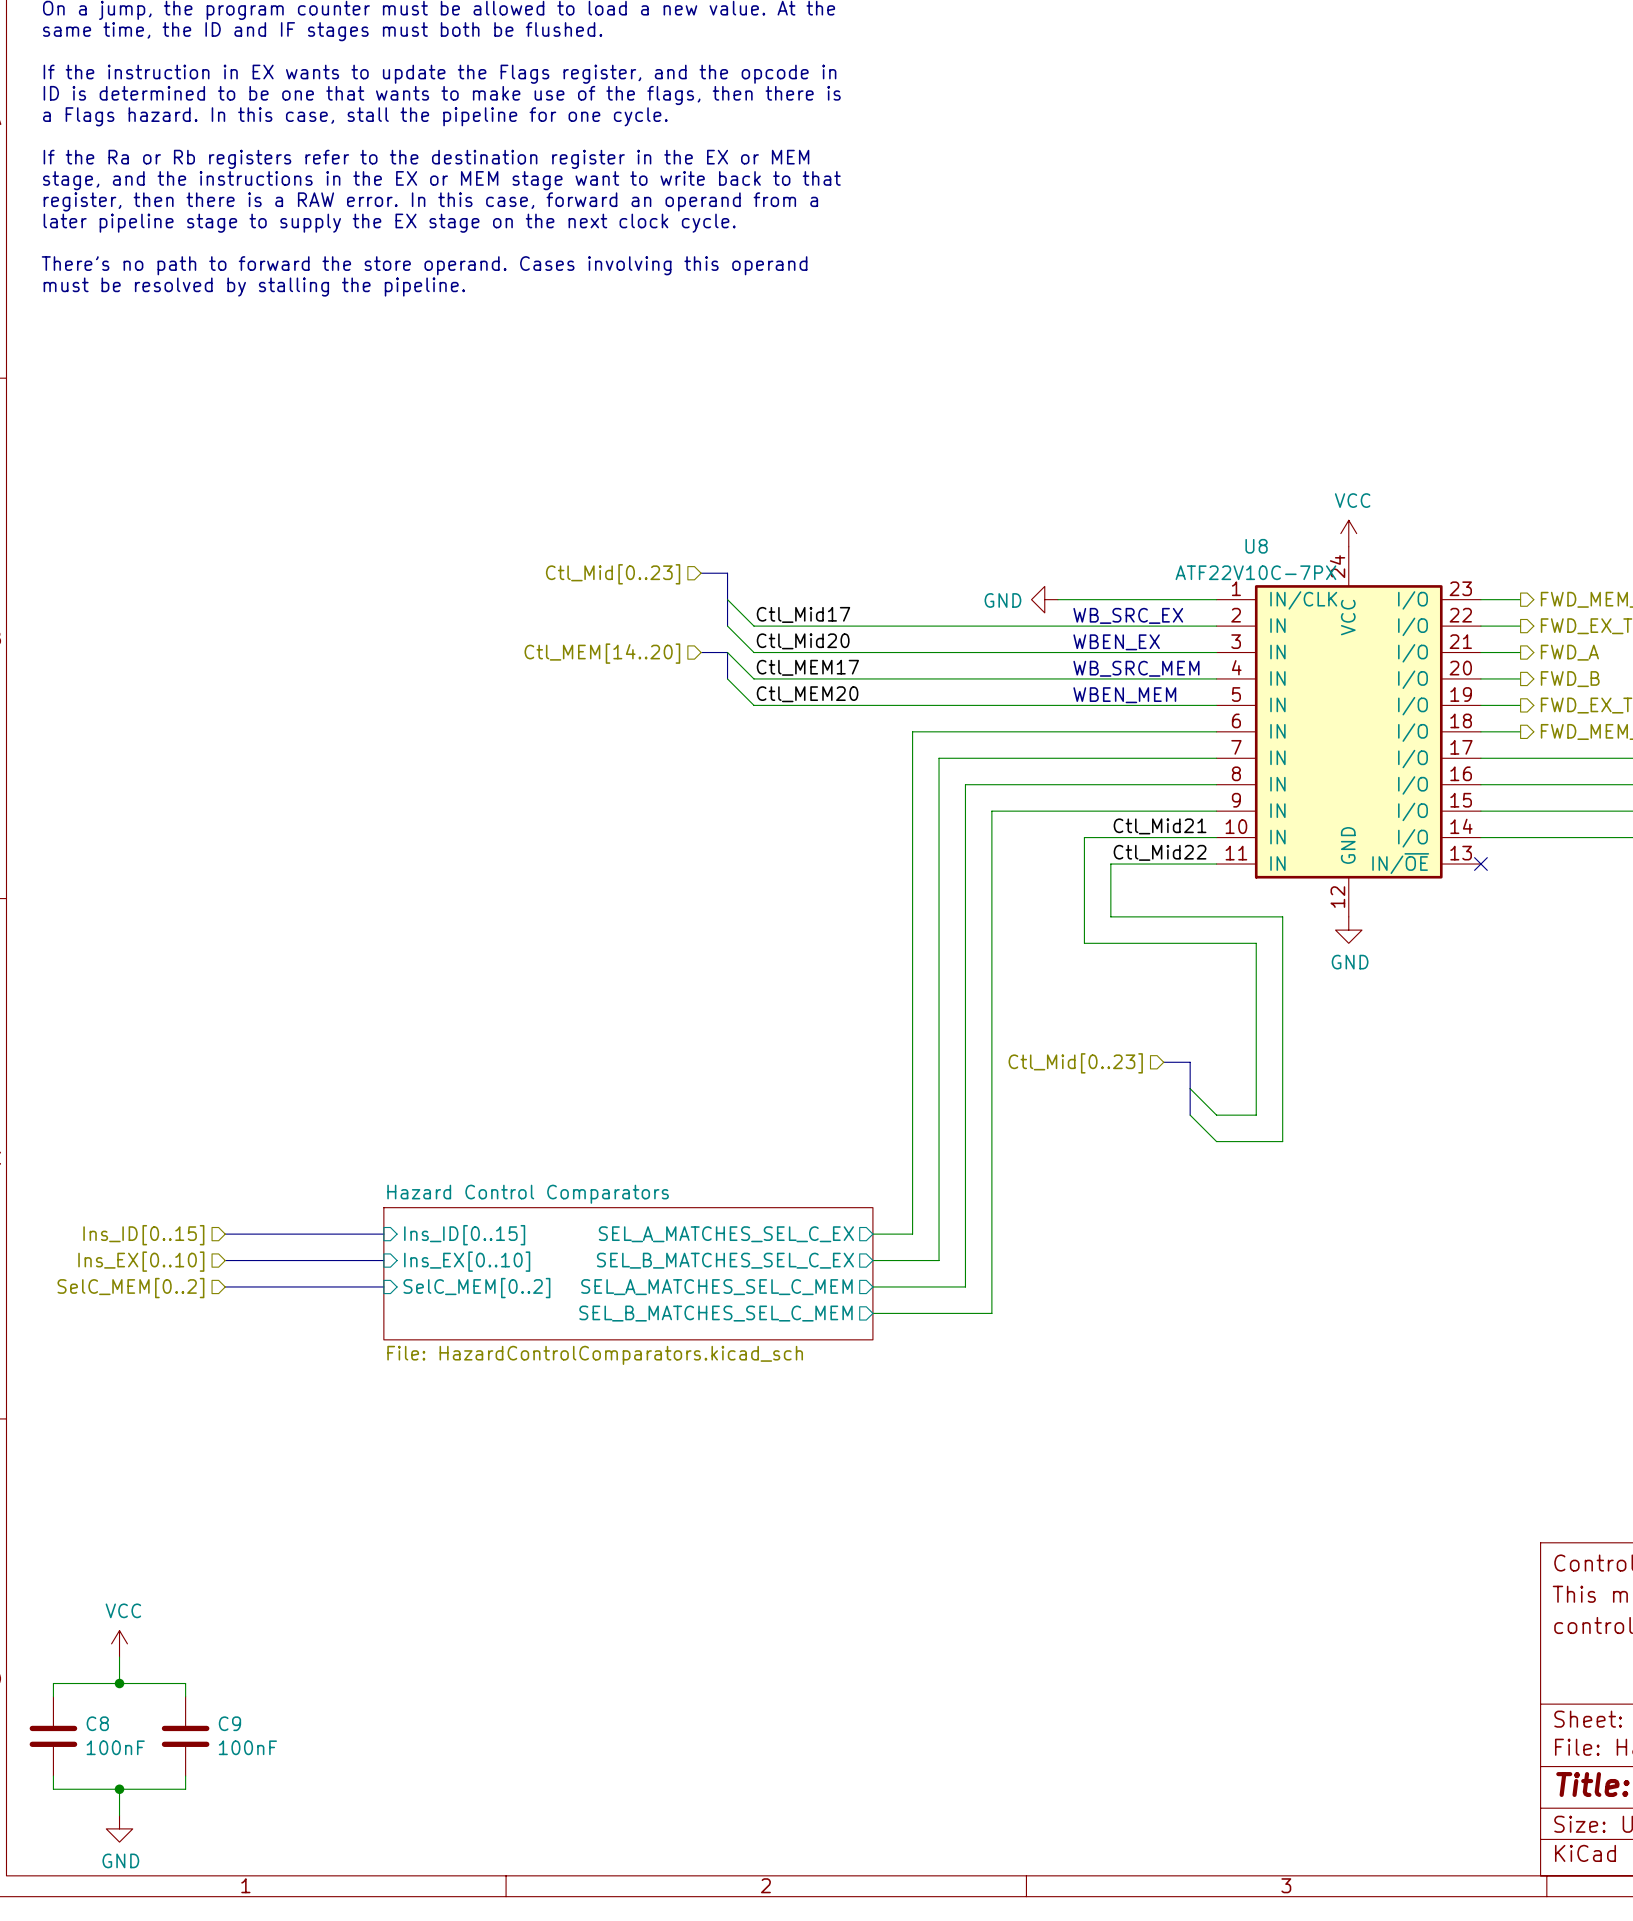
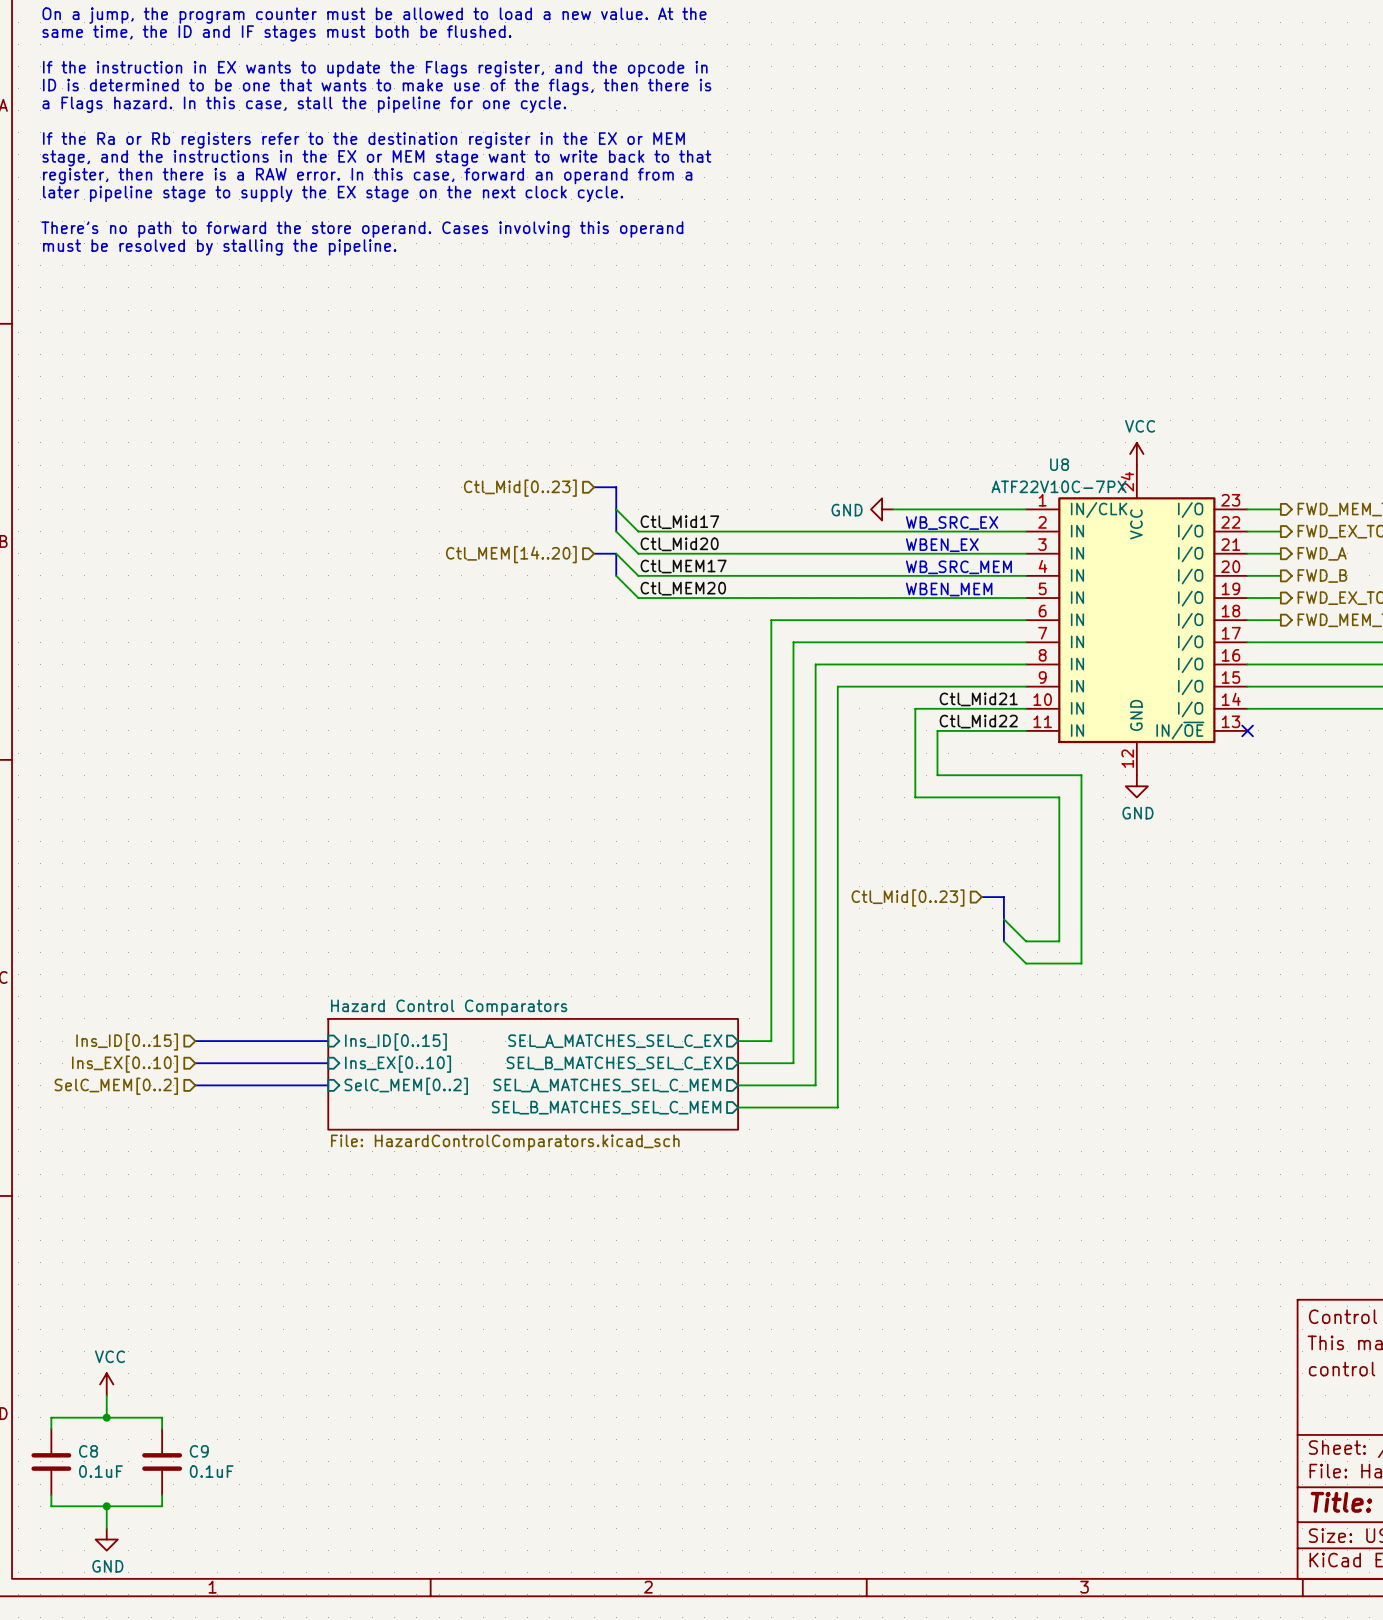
C8 value: 100nF (115, 1747) -> 0.1uF (100, 1471)
C9 value: 100nF (247, 1747) -> 0.1uF (211, 1471)

